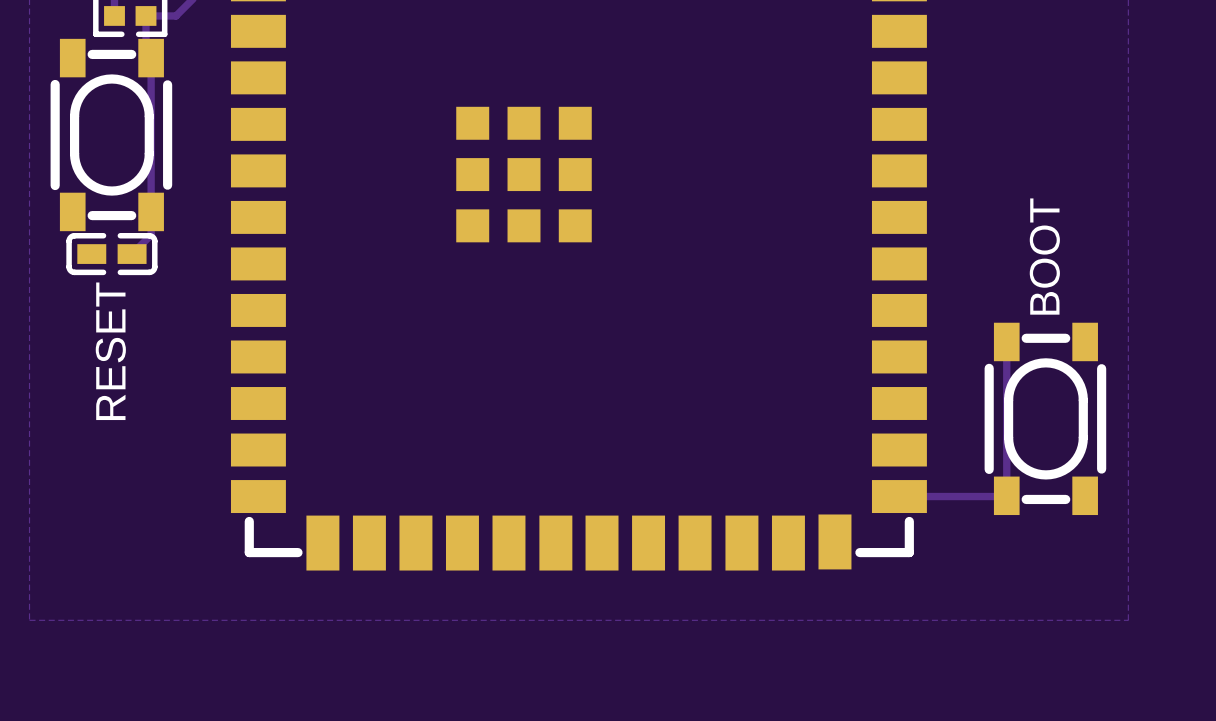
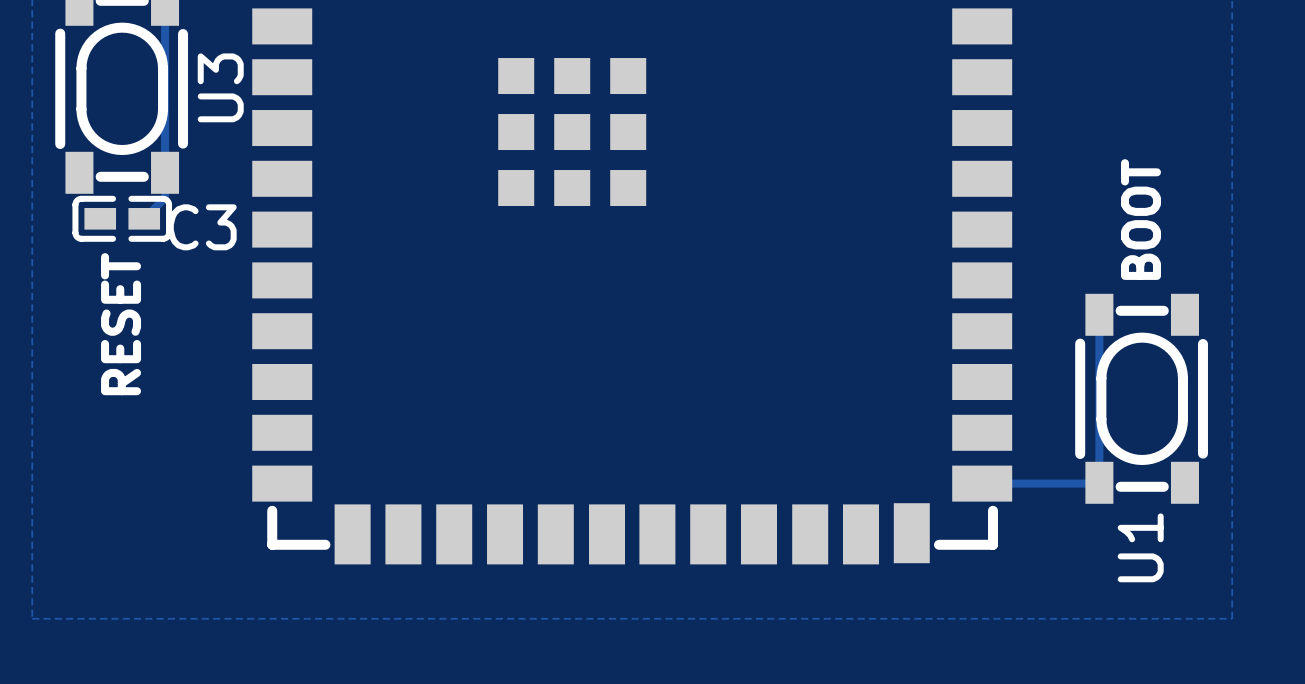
U3 name: none -> U3 (220, 87)
C3 name: none -> C3 (202, 227)
U1 name: none -> U1 (1140, 547)

